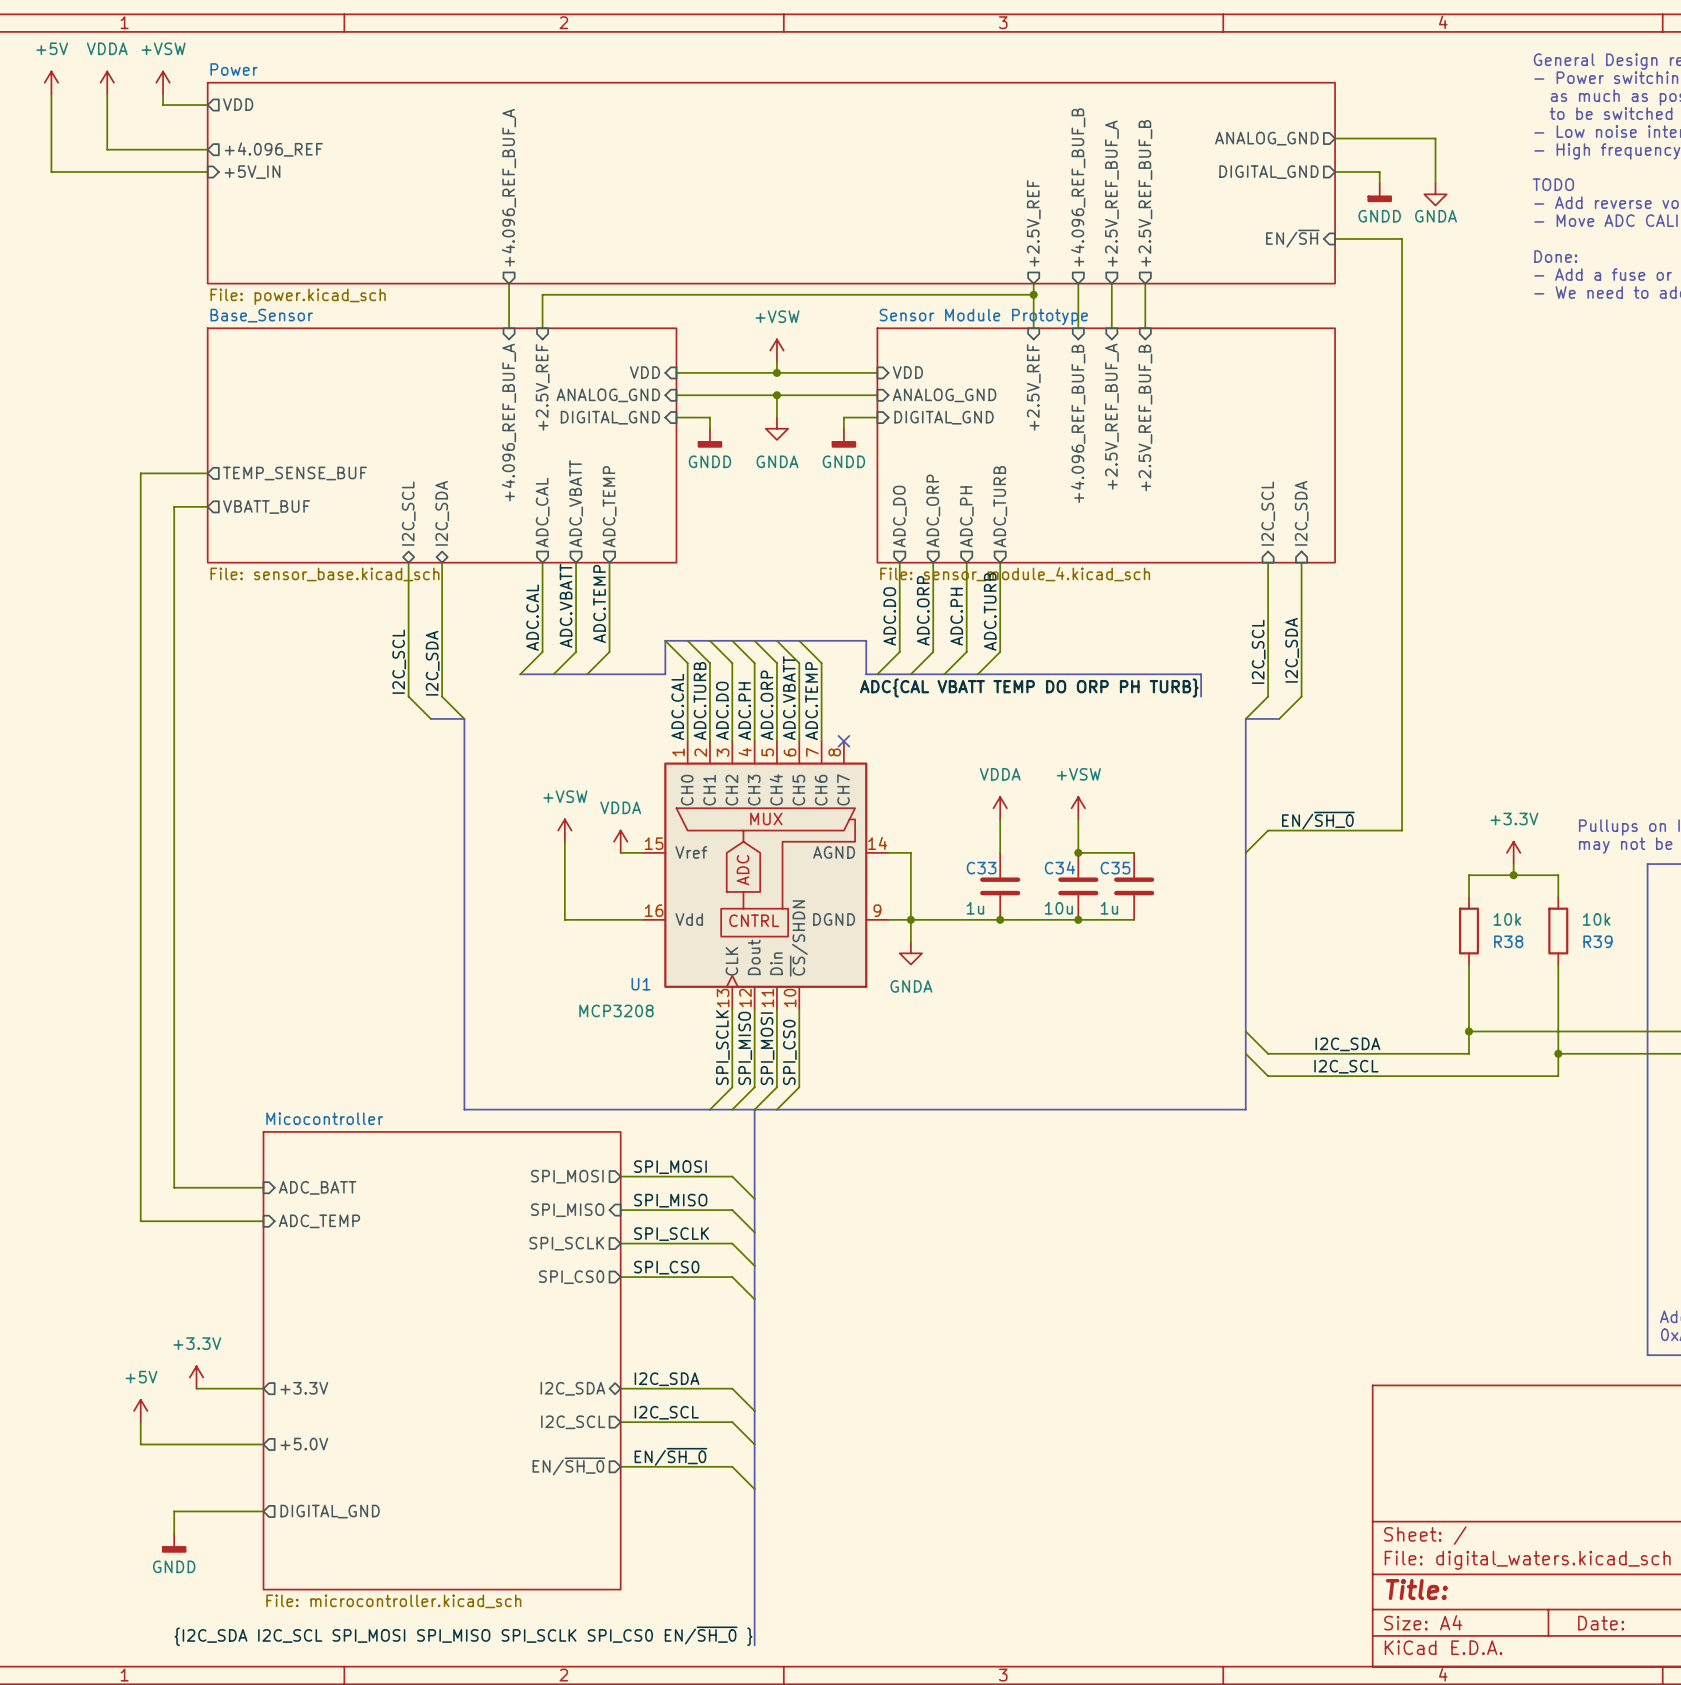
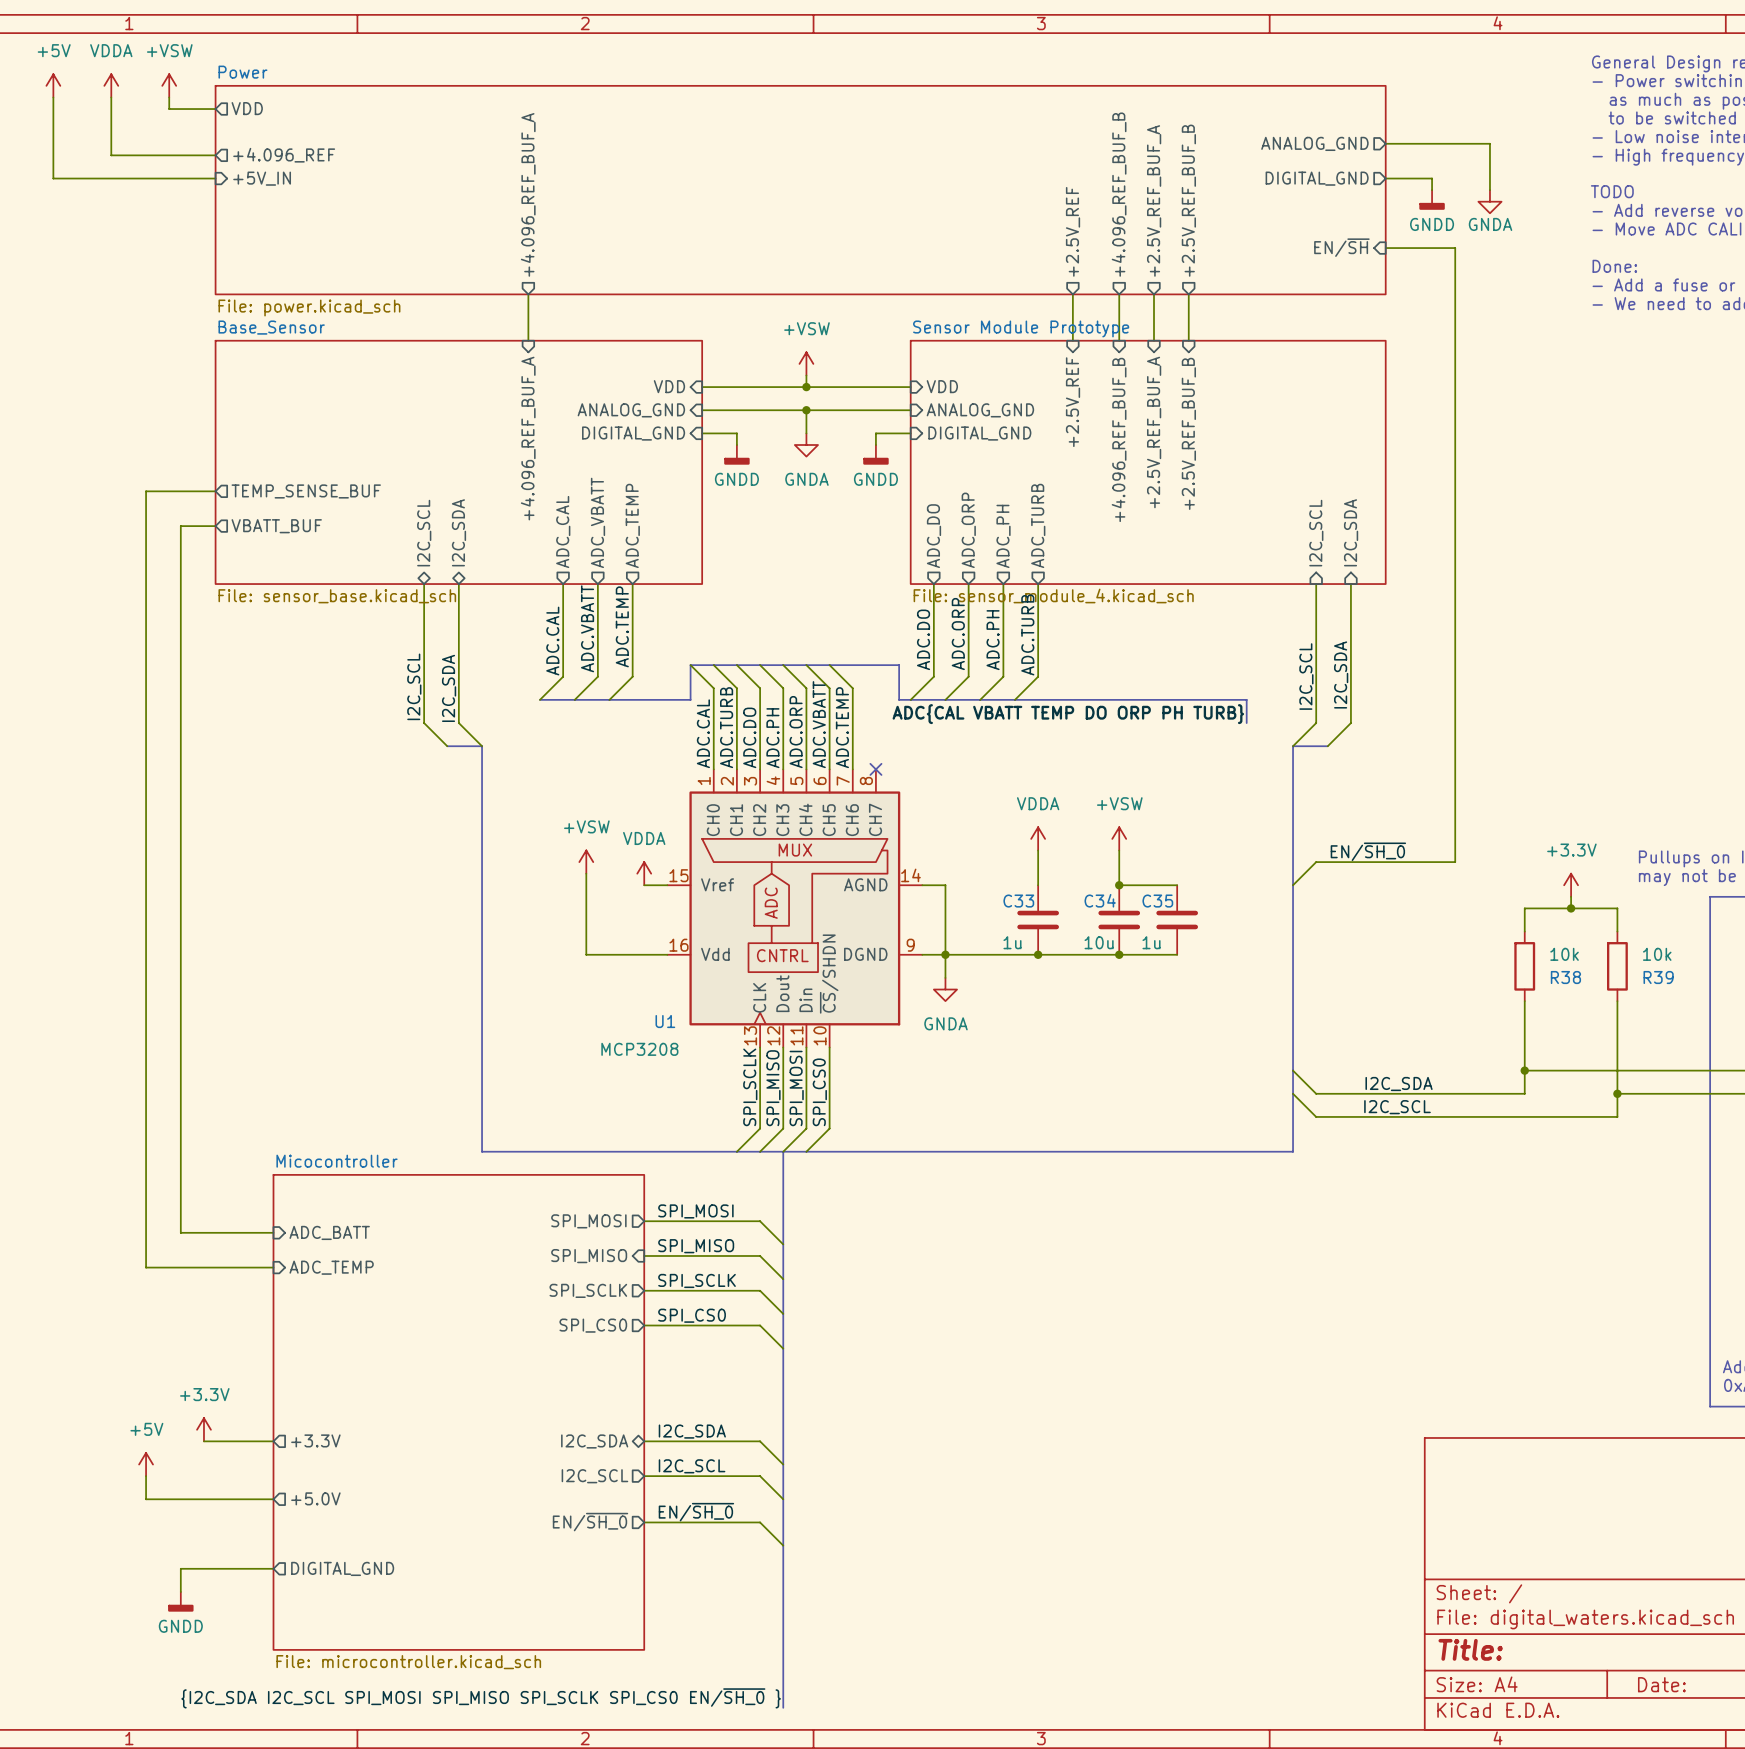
wire: (1033, 294) (542, 294) (542, 328) -> none
junction: (1033, 294) -> none
sheet pin: +2.5V_REF (542, 387) -> none

